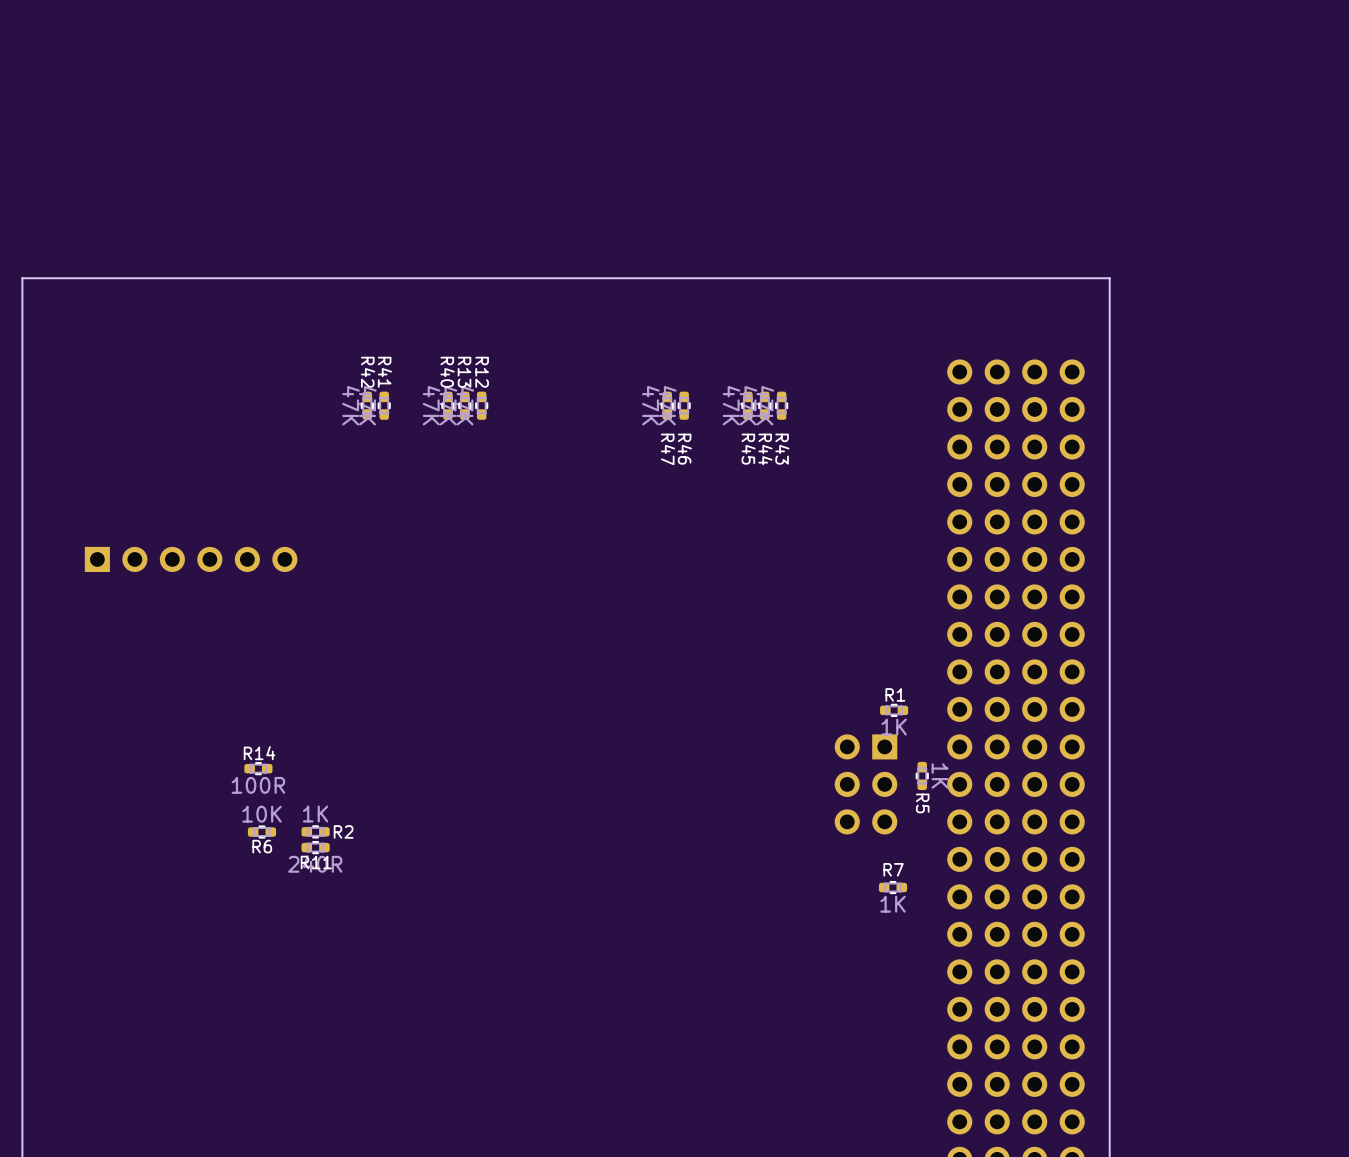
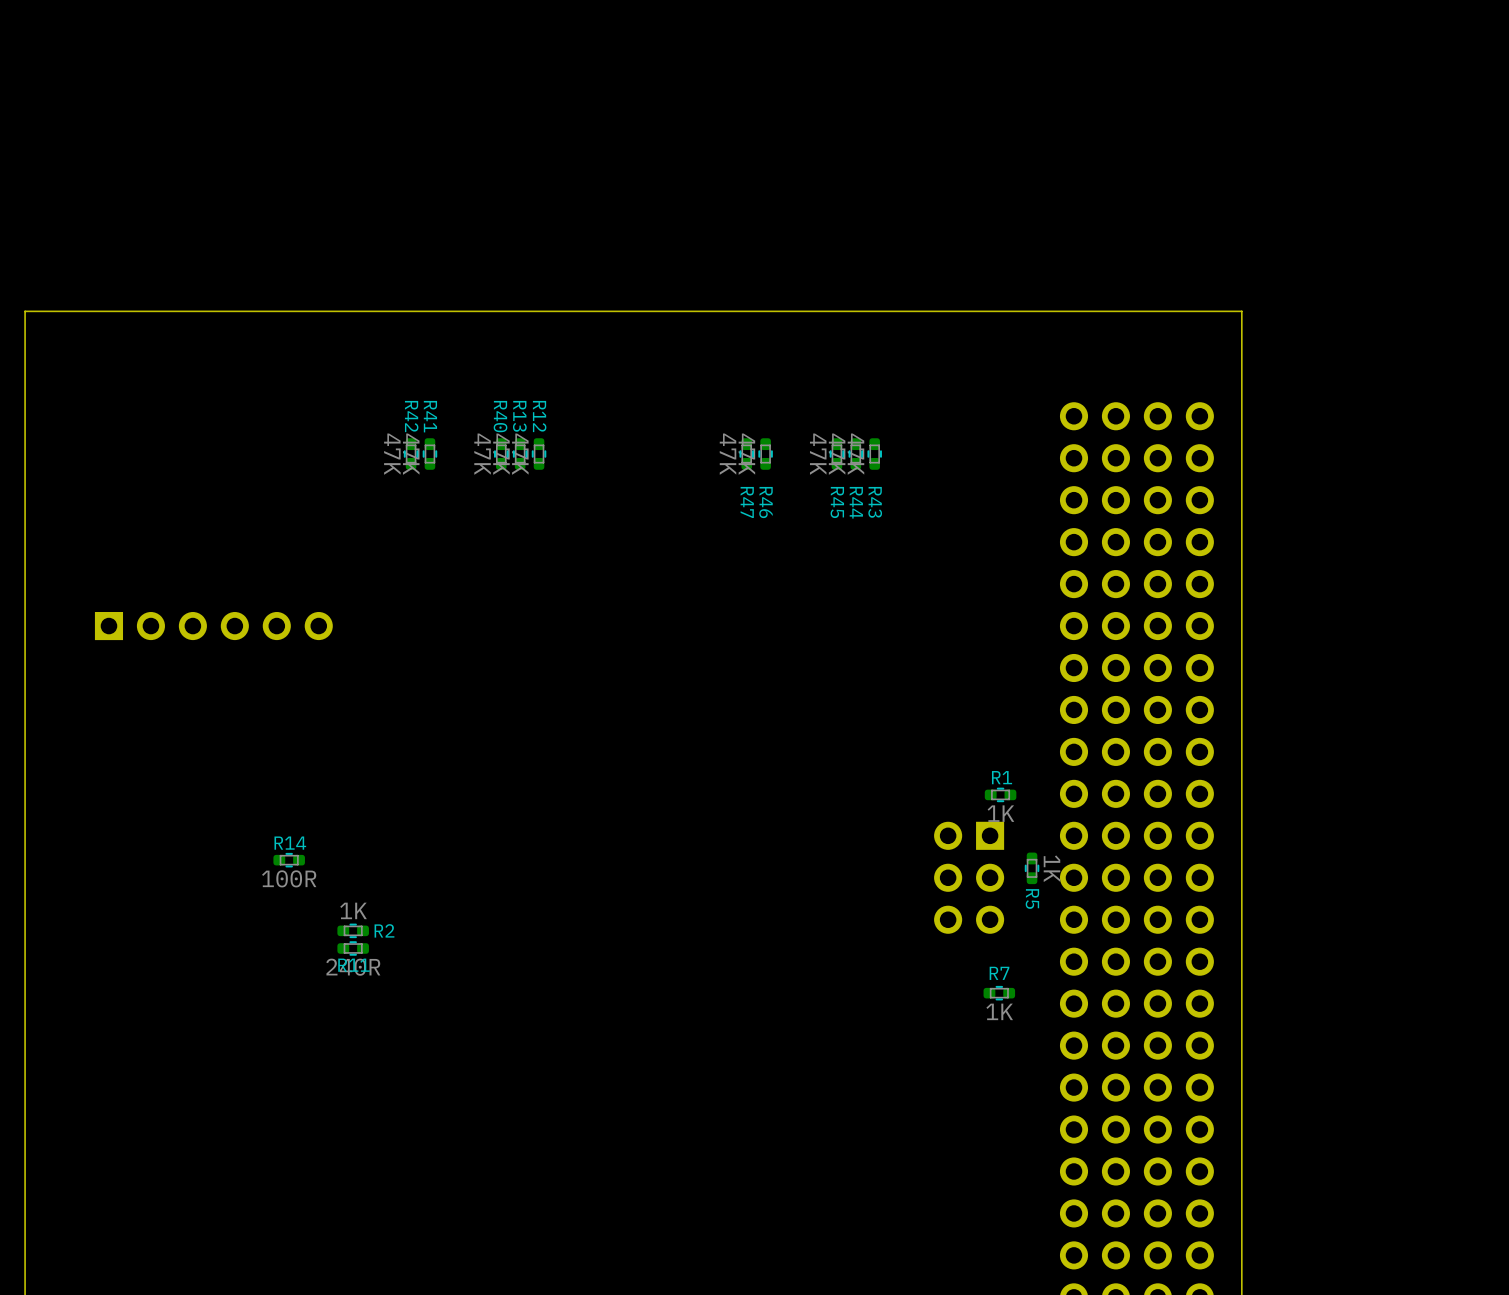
R6: 10K (261, 832) -> none

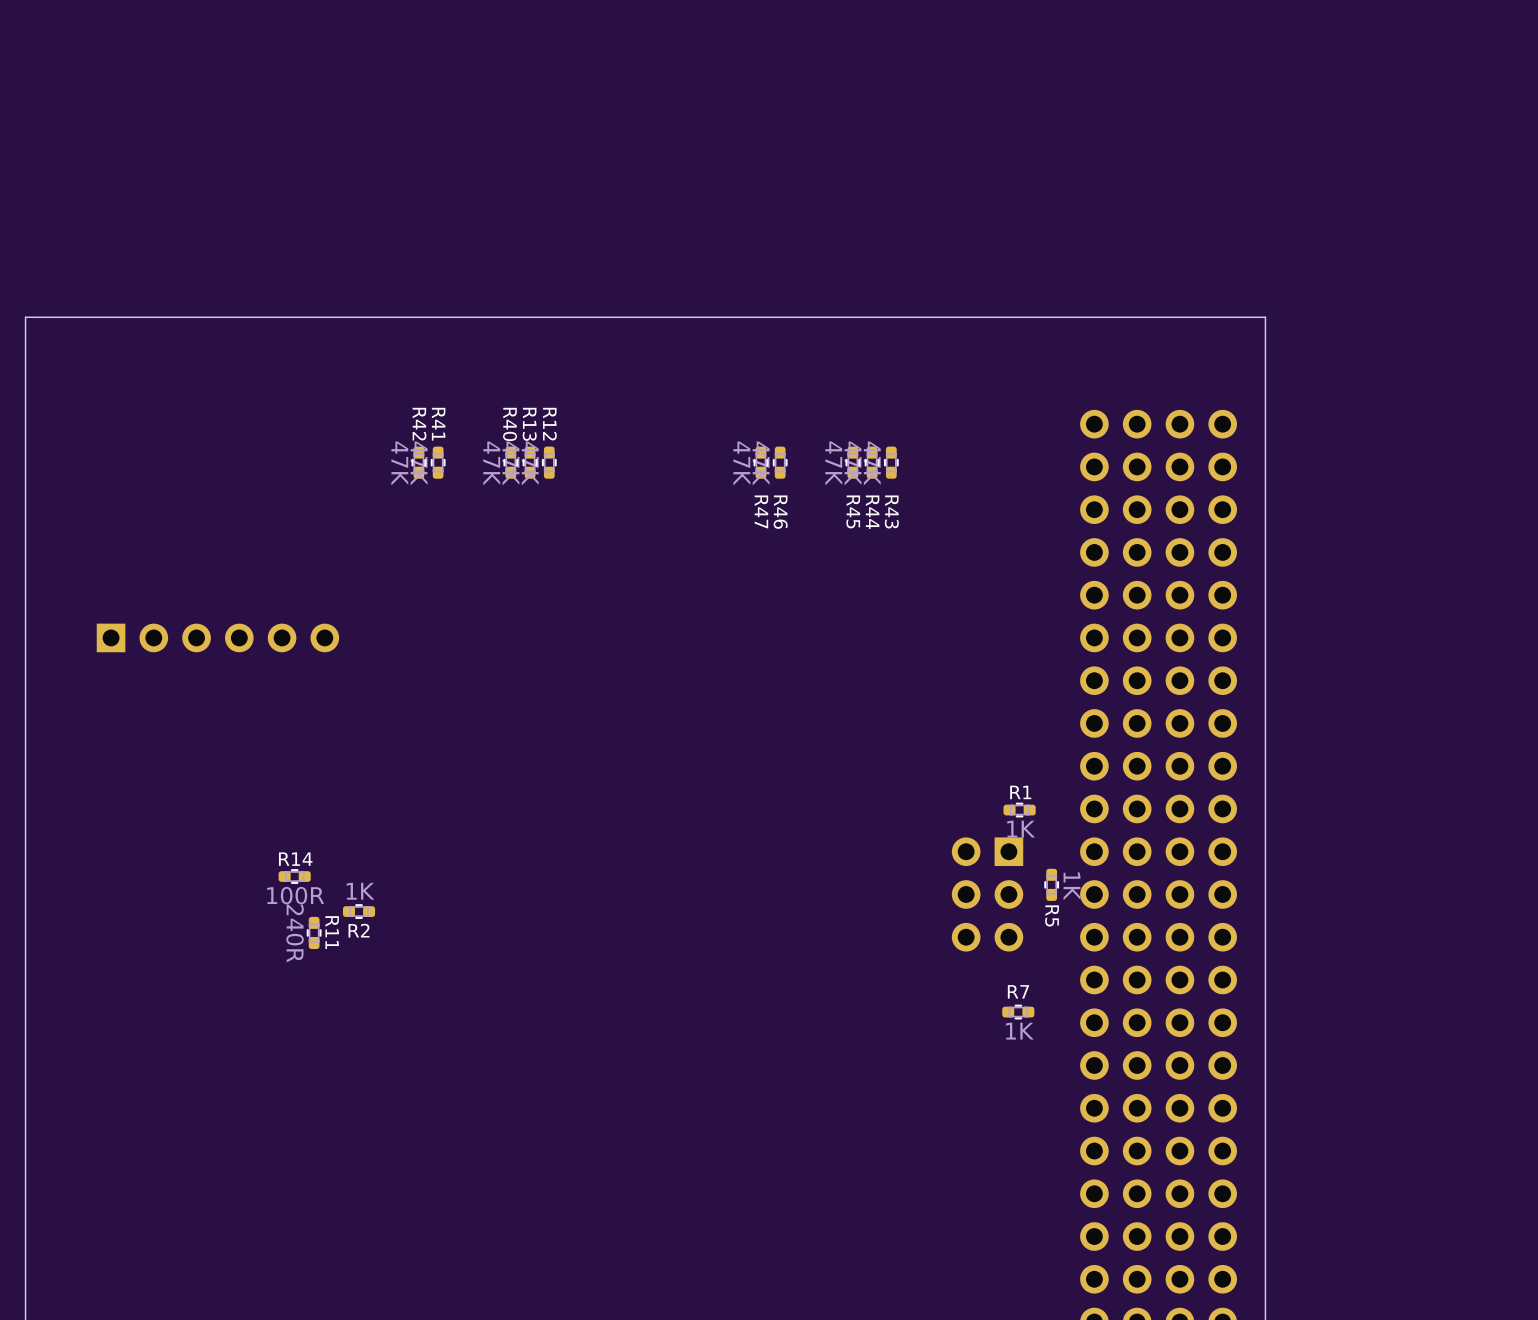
R2 position: (353, 930) -> (359, 911)
R2 name position: R2 (384, 930) -> R2 (359, 930)
R11 rotation: 0° (353, 948) -> 90° clockwise (314, 932)
R11 position: (353, 948) -> (314, 932)

